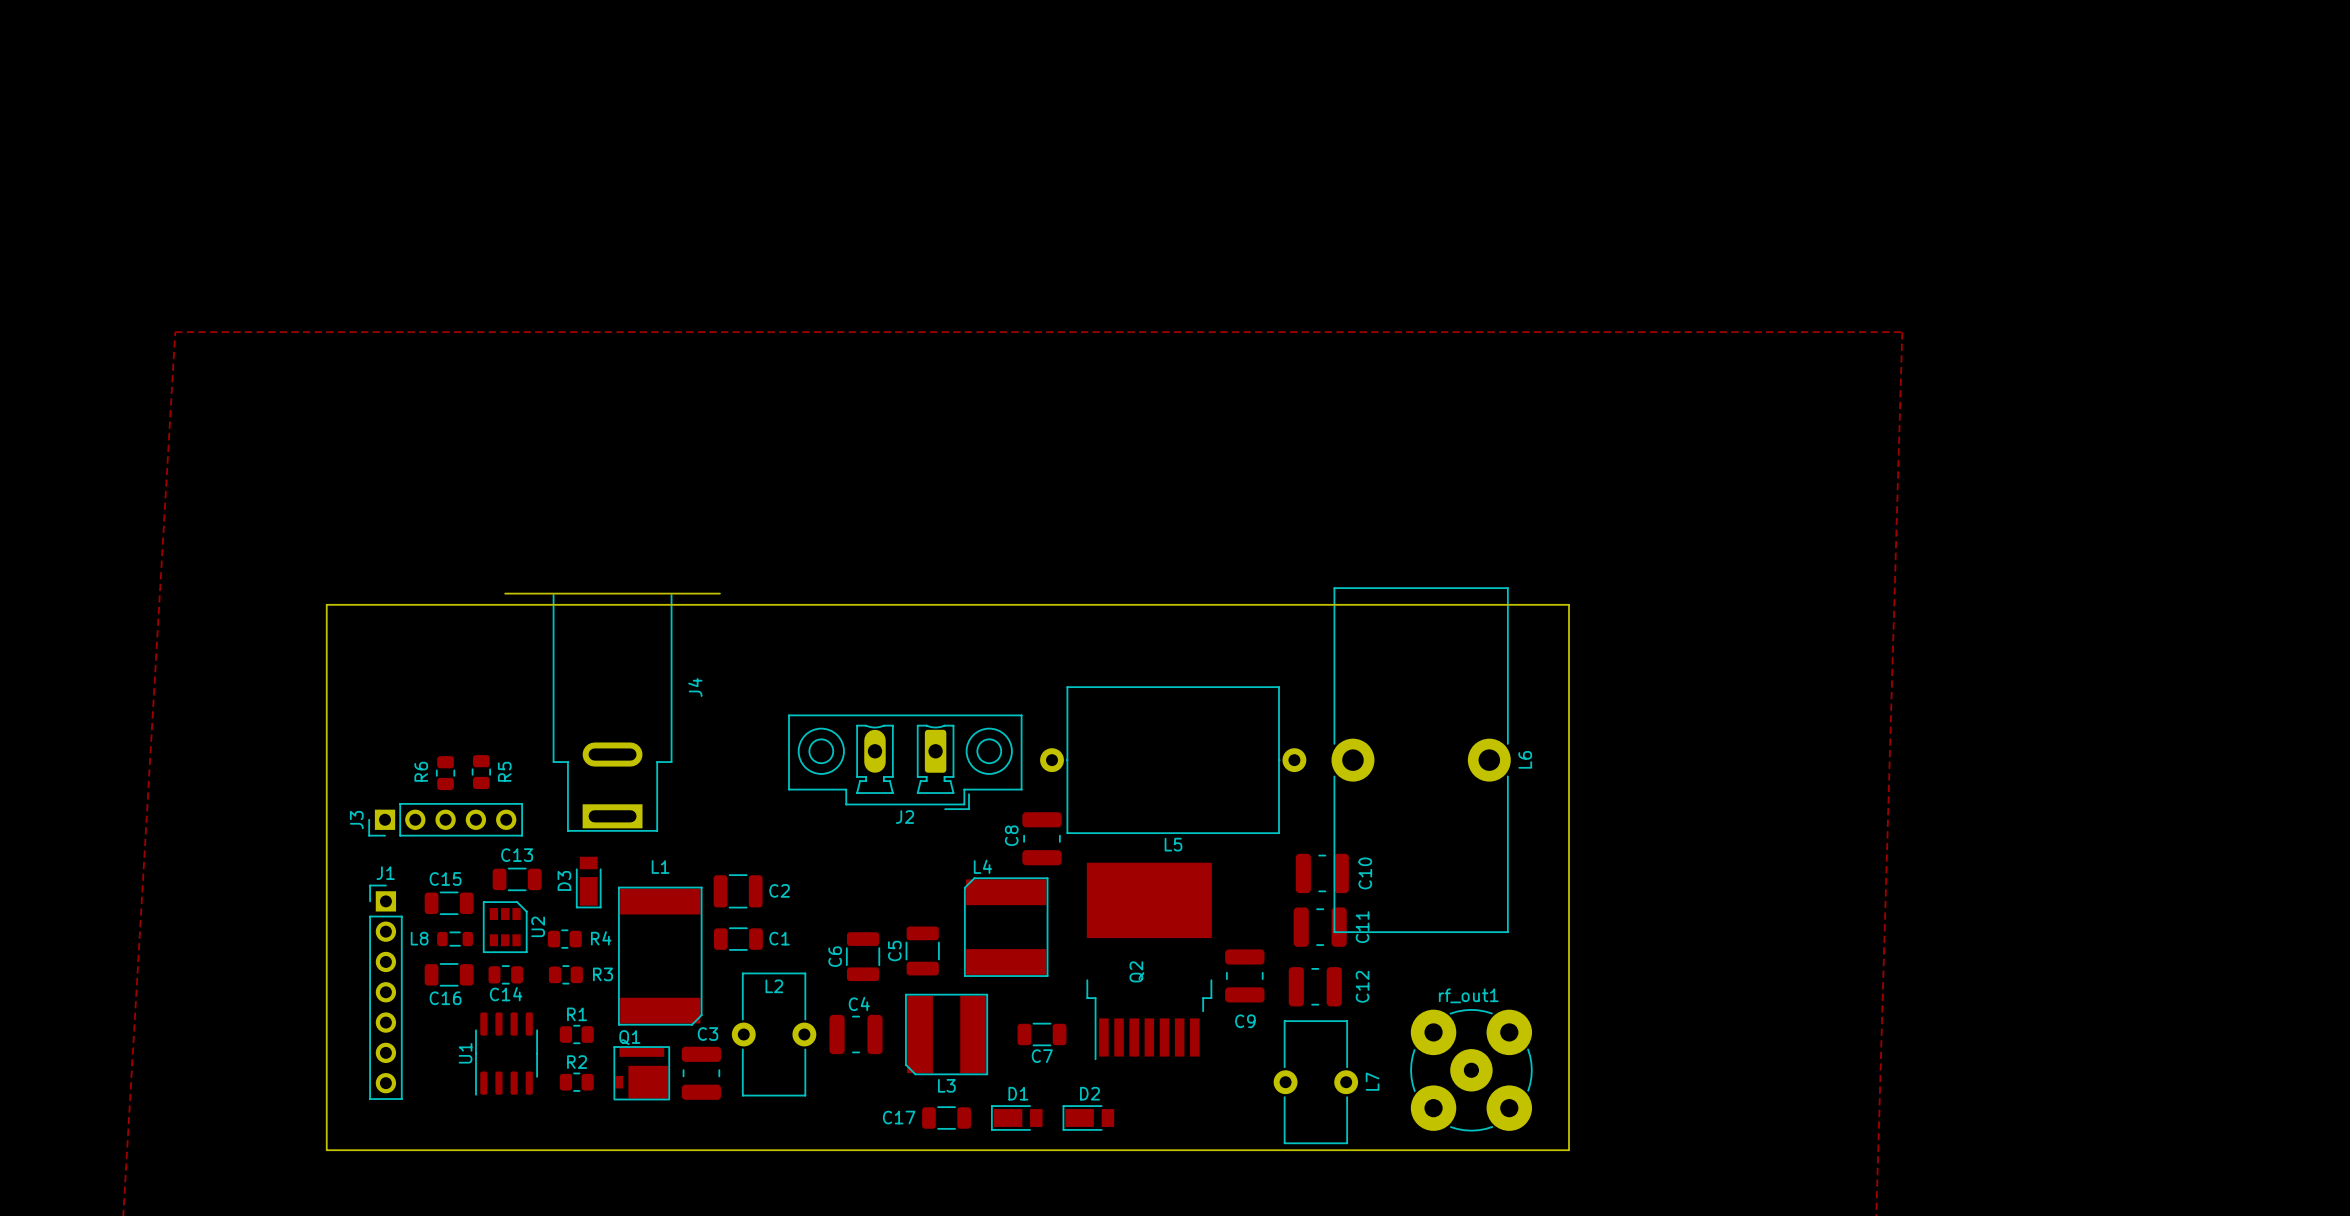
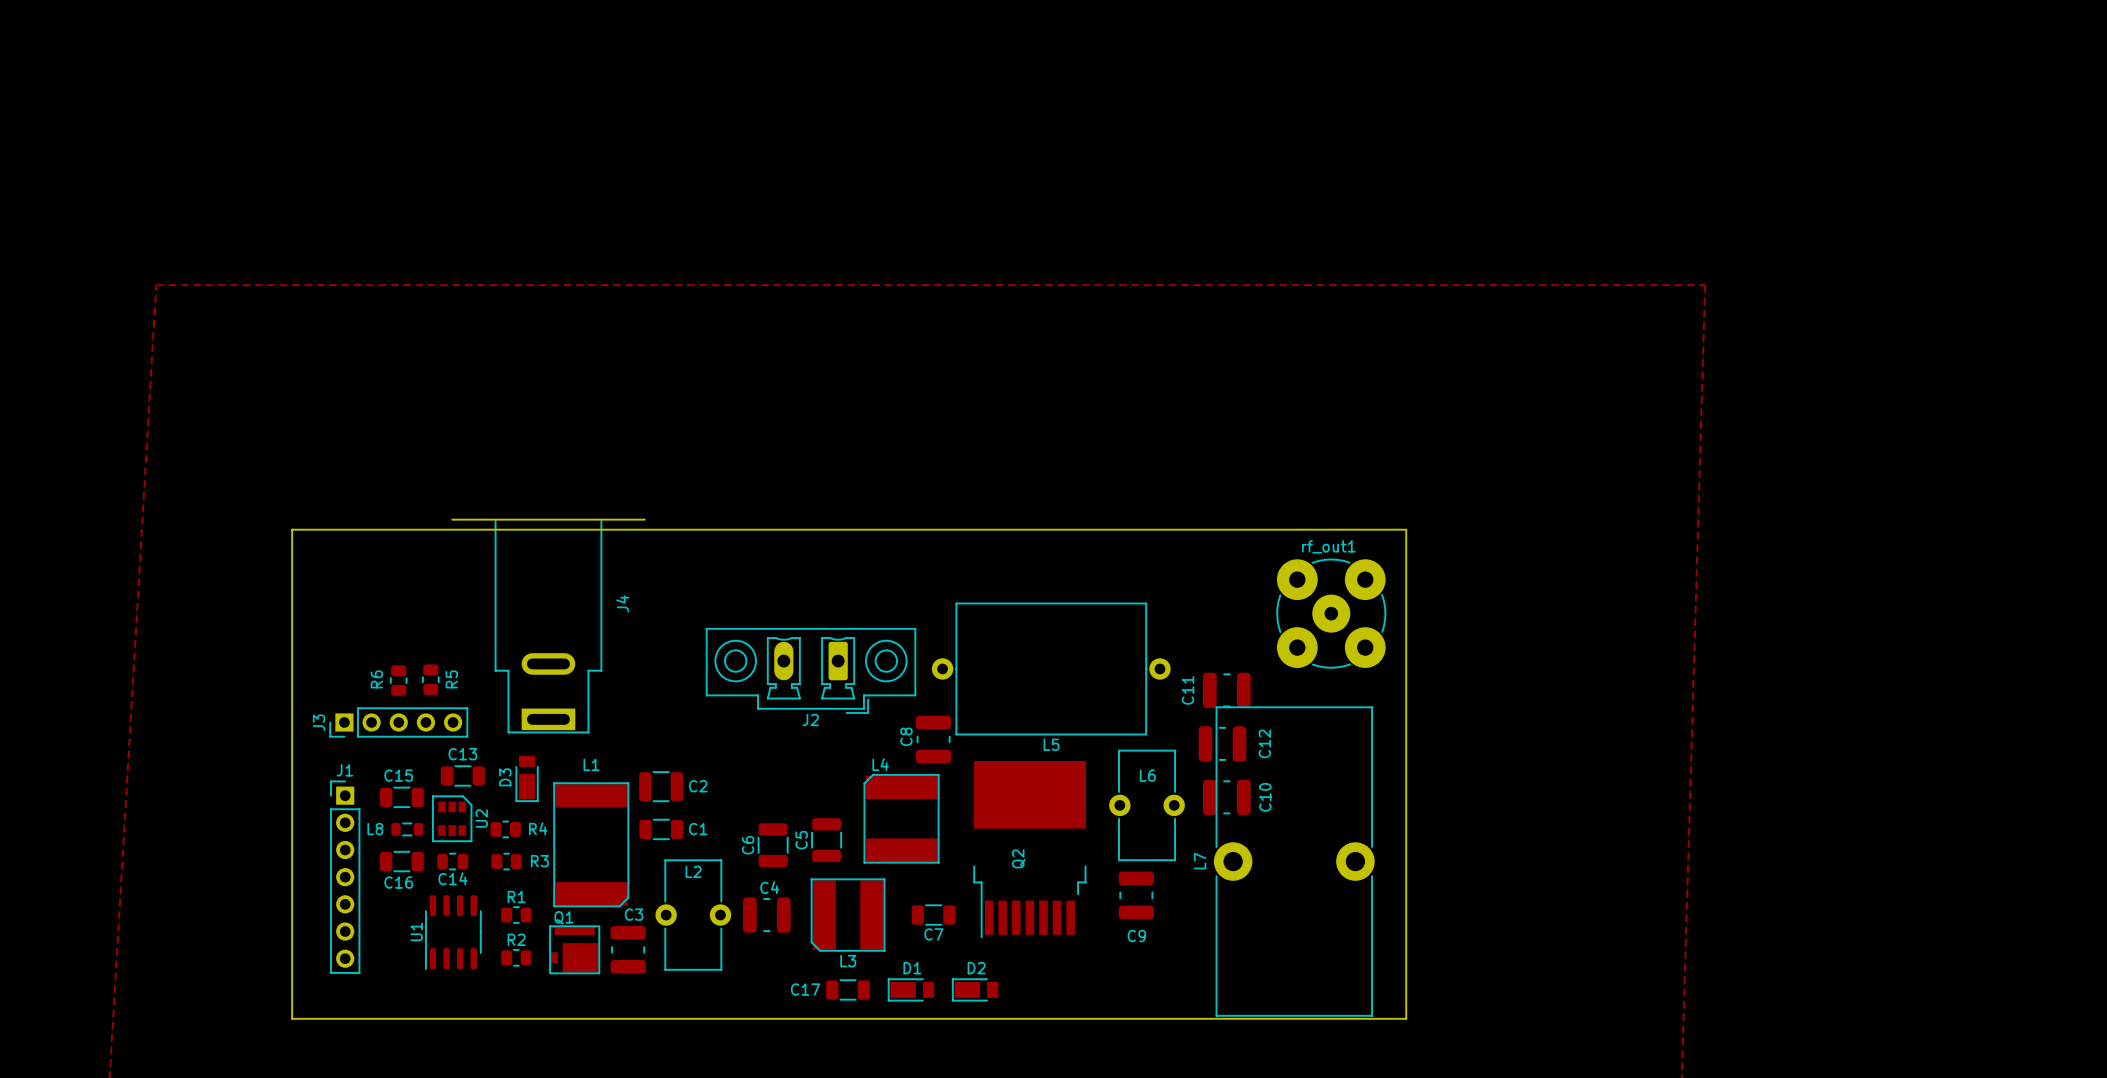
L6 footprint: [1331, 587, 1511, 933] -> [1109, 749, 1185, 861]
L6 name position: L6 (1525, 759) -> L6 (1147, 775)
C10 position: (1322, 873) -> (1226, 797)
C11 position: (1320, 927) -> (1226, 690)
C11 name position: C11 (1362, 927) -> C11 (1188, 690)
C9 position: (1244, 975) -> (1136, 895)
C12 position: (1315, 986) -> (1222, 743)
L7 footprint: [1273, 1020, 1359, 1145] -> [1213, 706, 1375, 1017]
rf_out1 position: (1471, 1070) -> (1331, 613)
L7 name position: L7 (1372, 1081) -> L7 (1200, 861)

